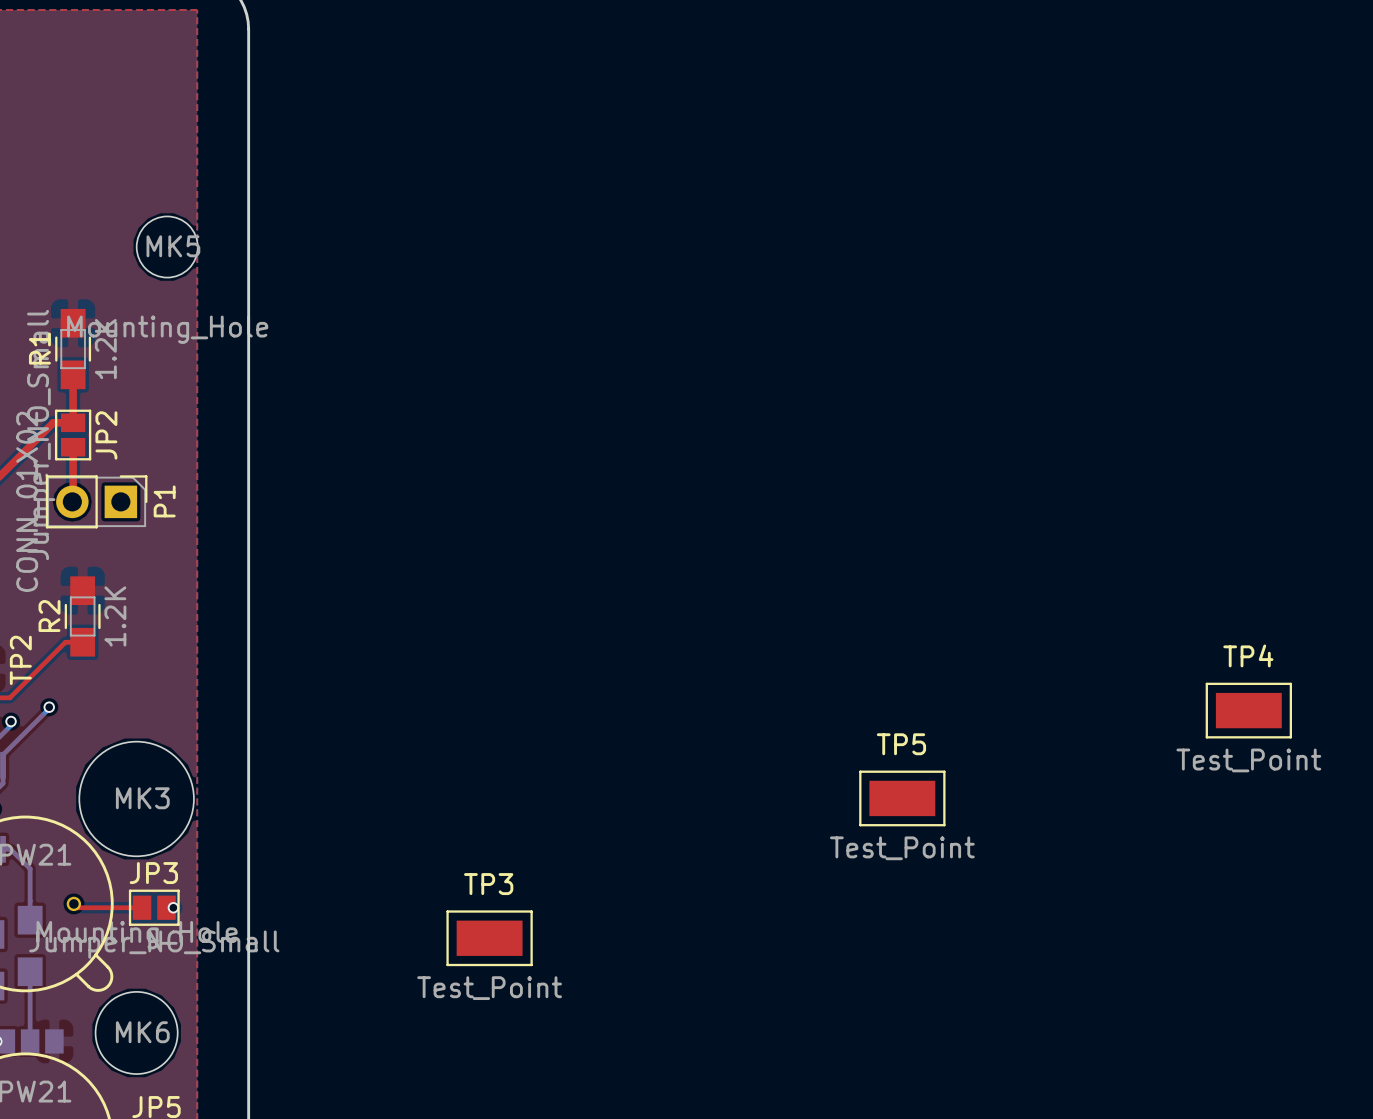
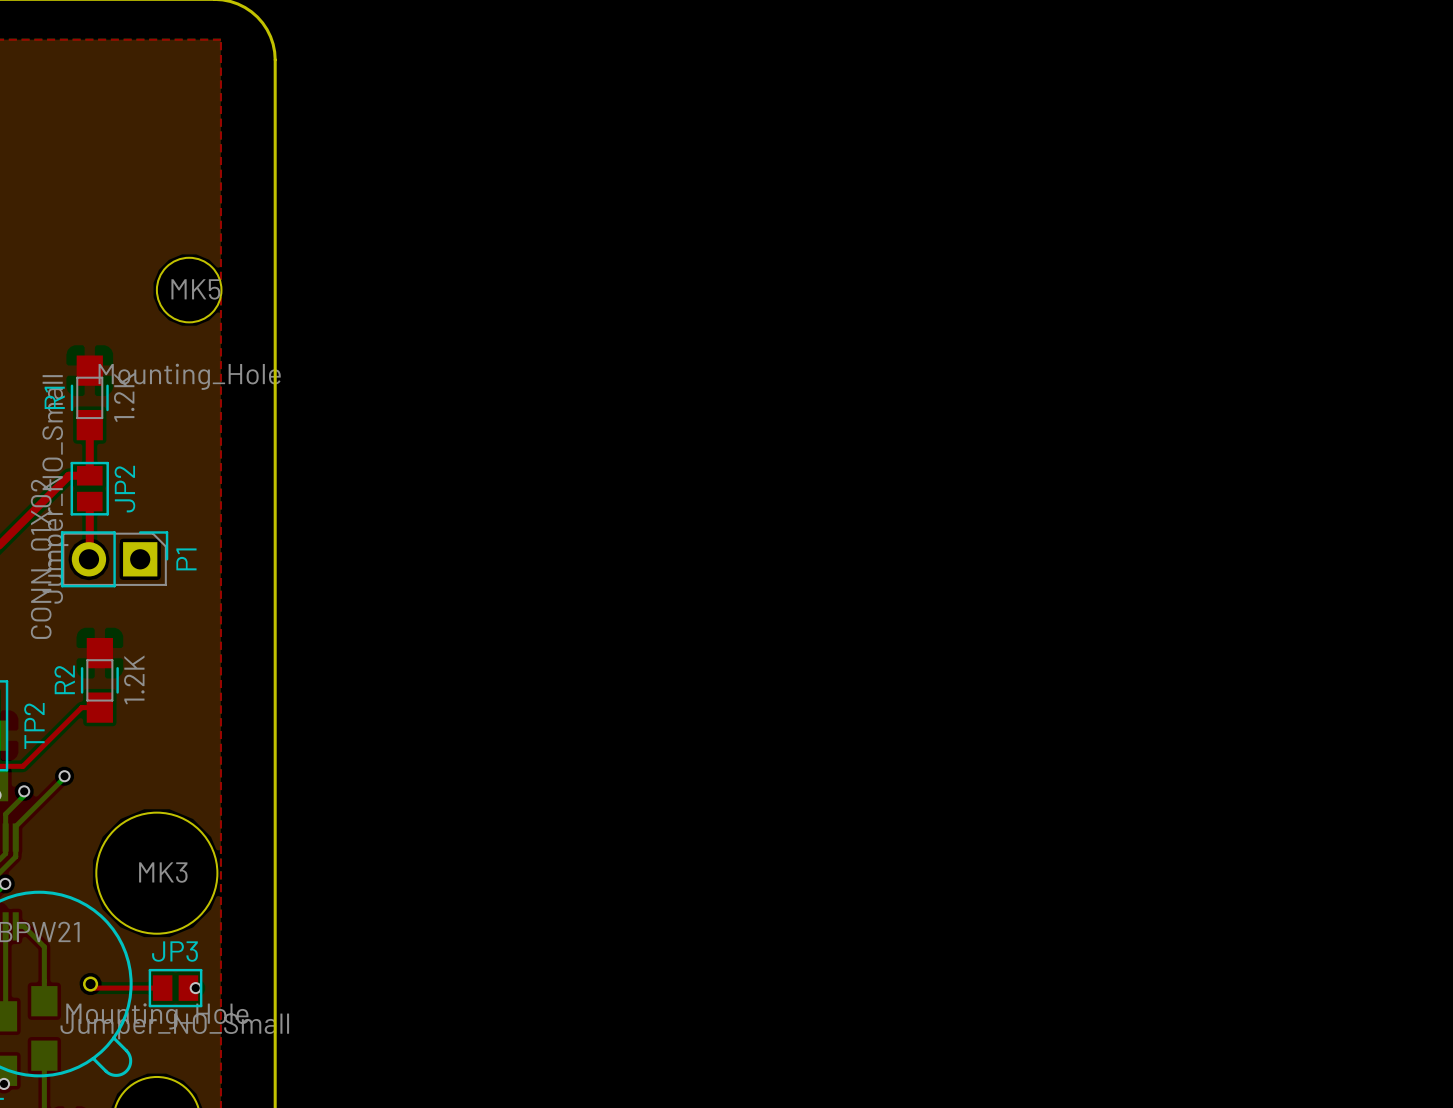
TP4: Test_Point (1248, 710) -> none
TP5: Test_Point (902, 798) -> none
TP3: Test_Point (489, 938) -> none

